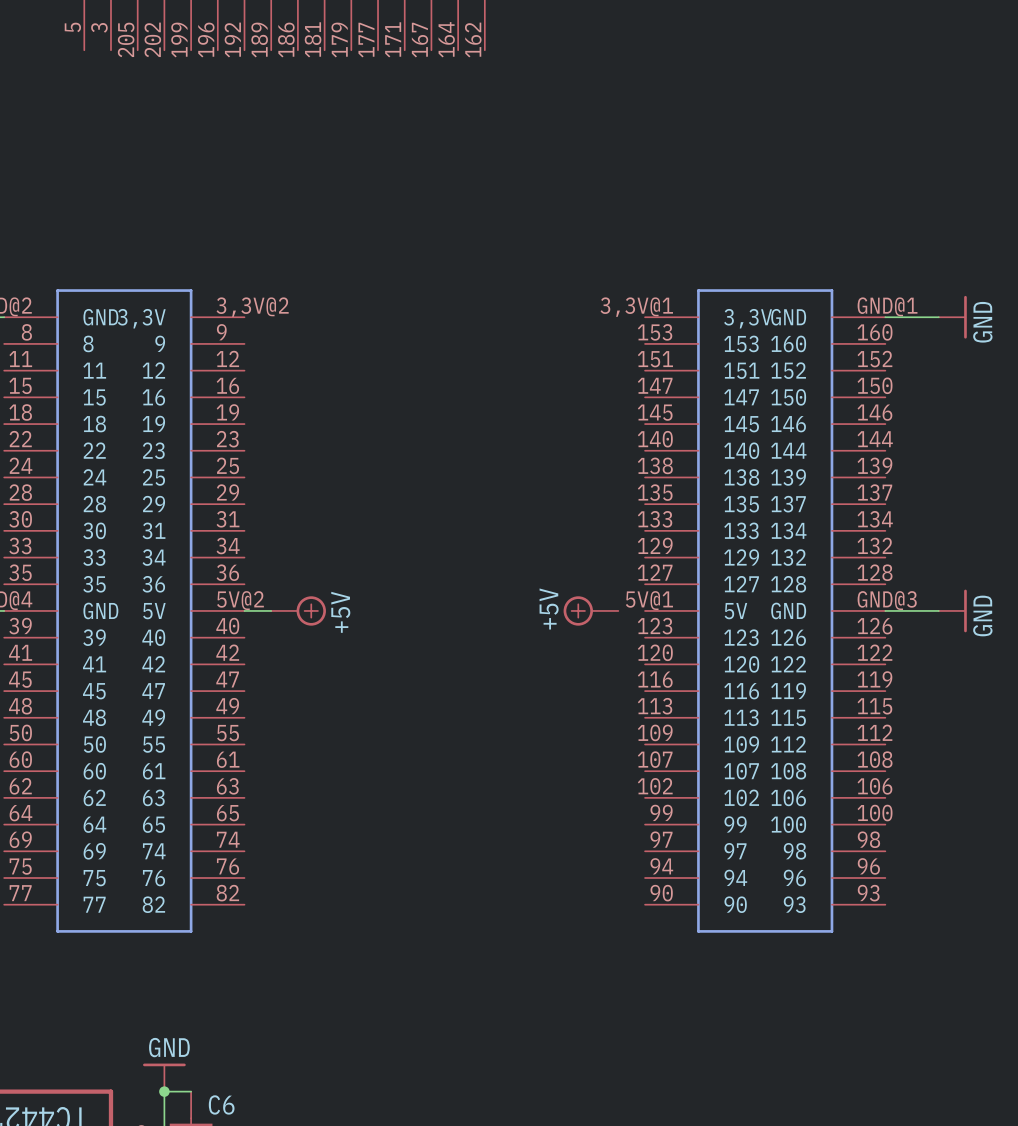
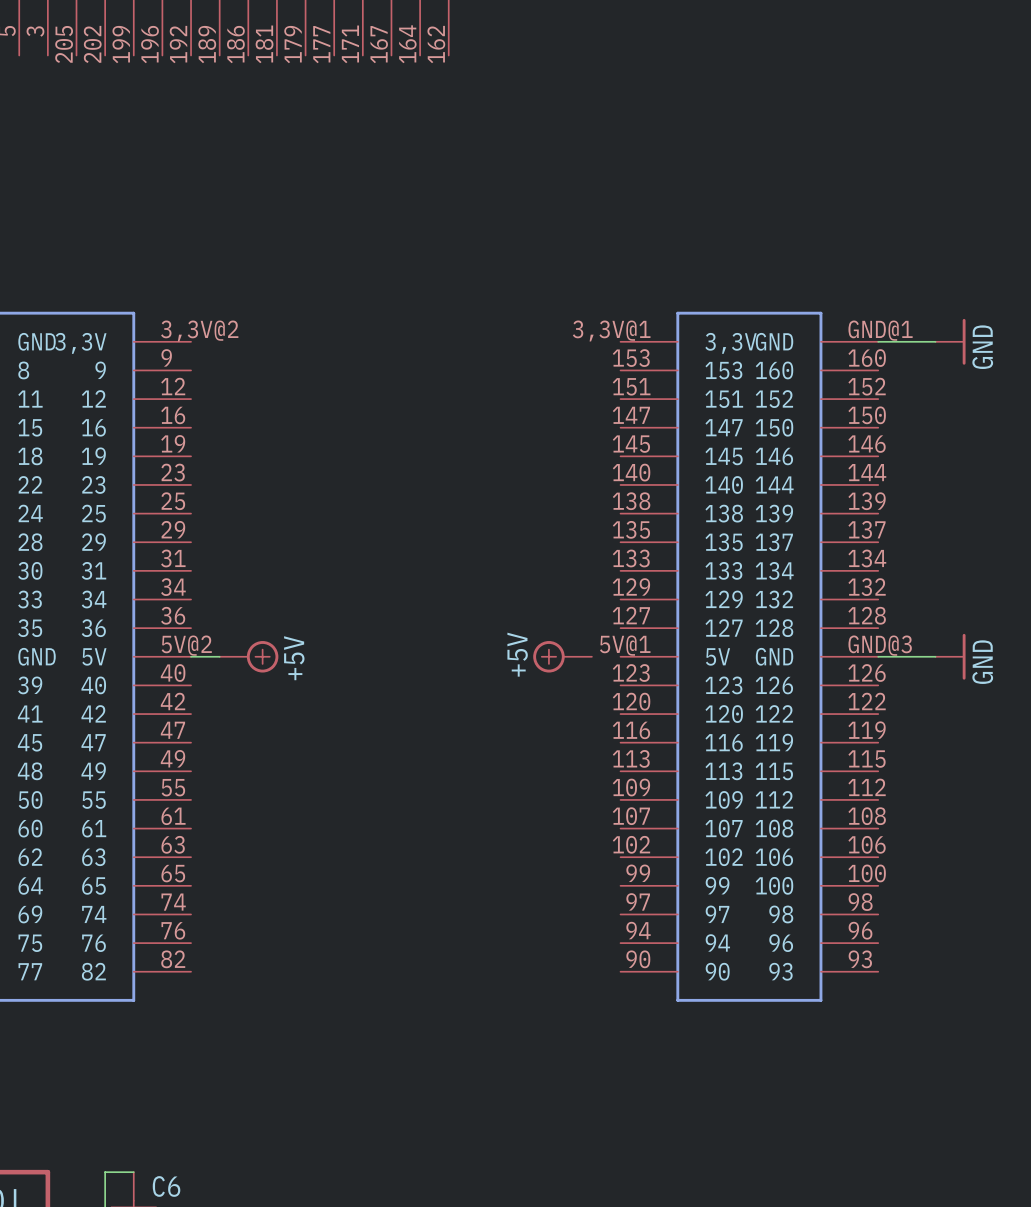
power symbol: GND (164, 1077) -> none
junction: (164, 1091) -> none

